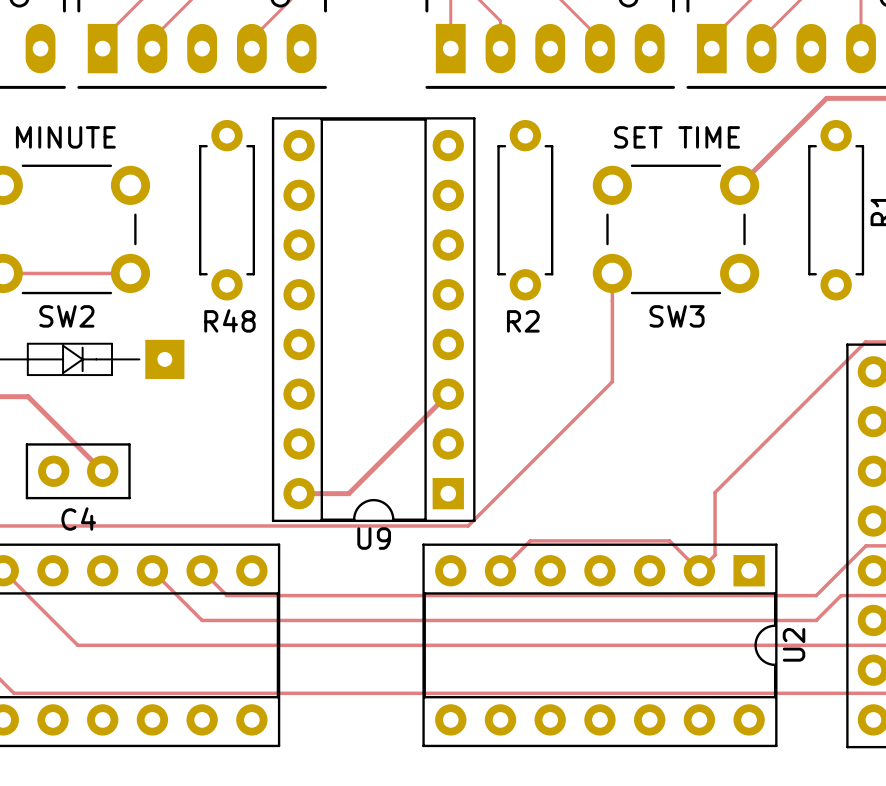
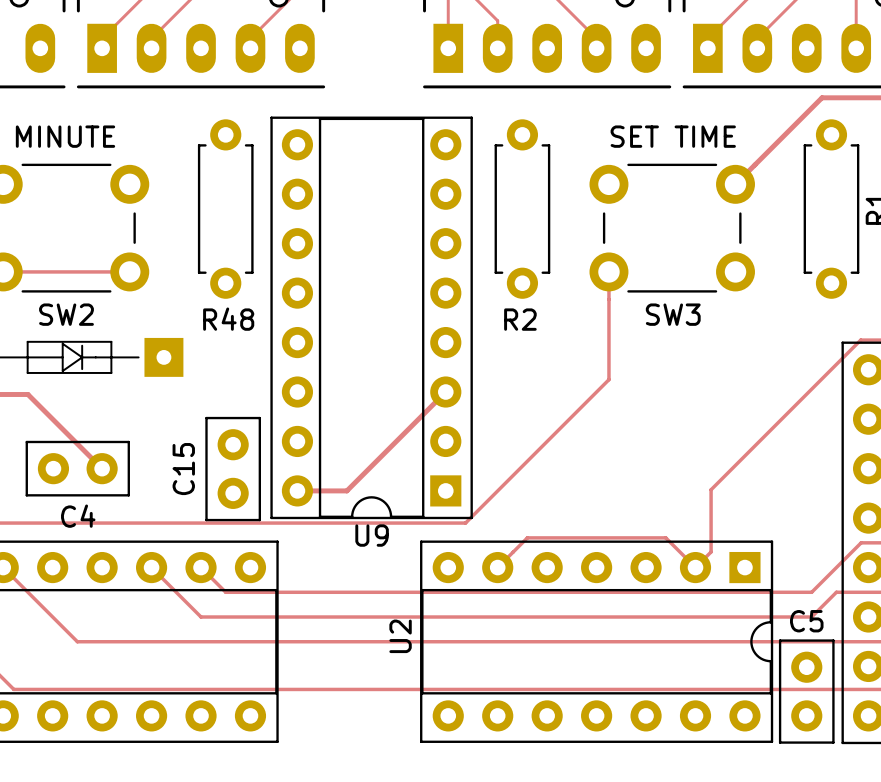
C15: none -> (233, 469)
U2 name position: U2 (794, 644) -> U2 (400, 636)
C5: none -> (806, 691)

